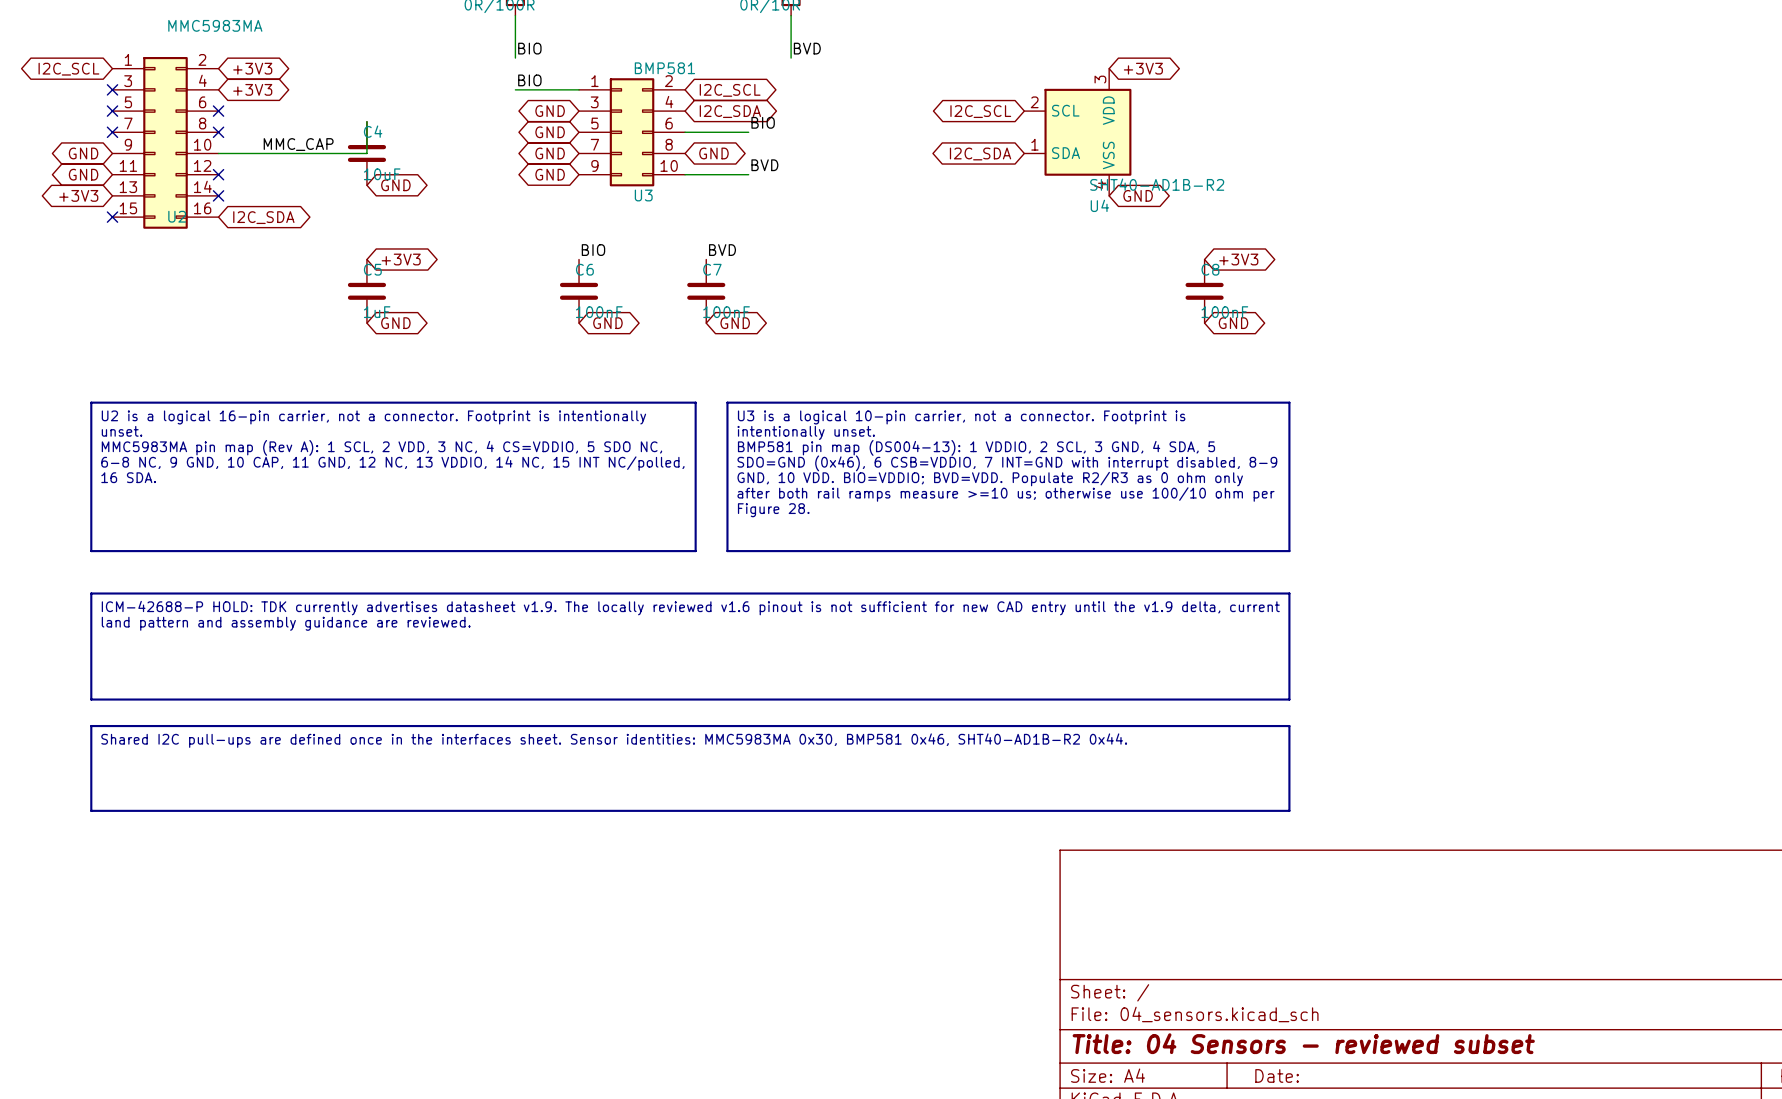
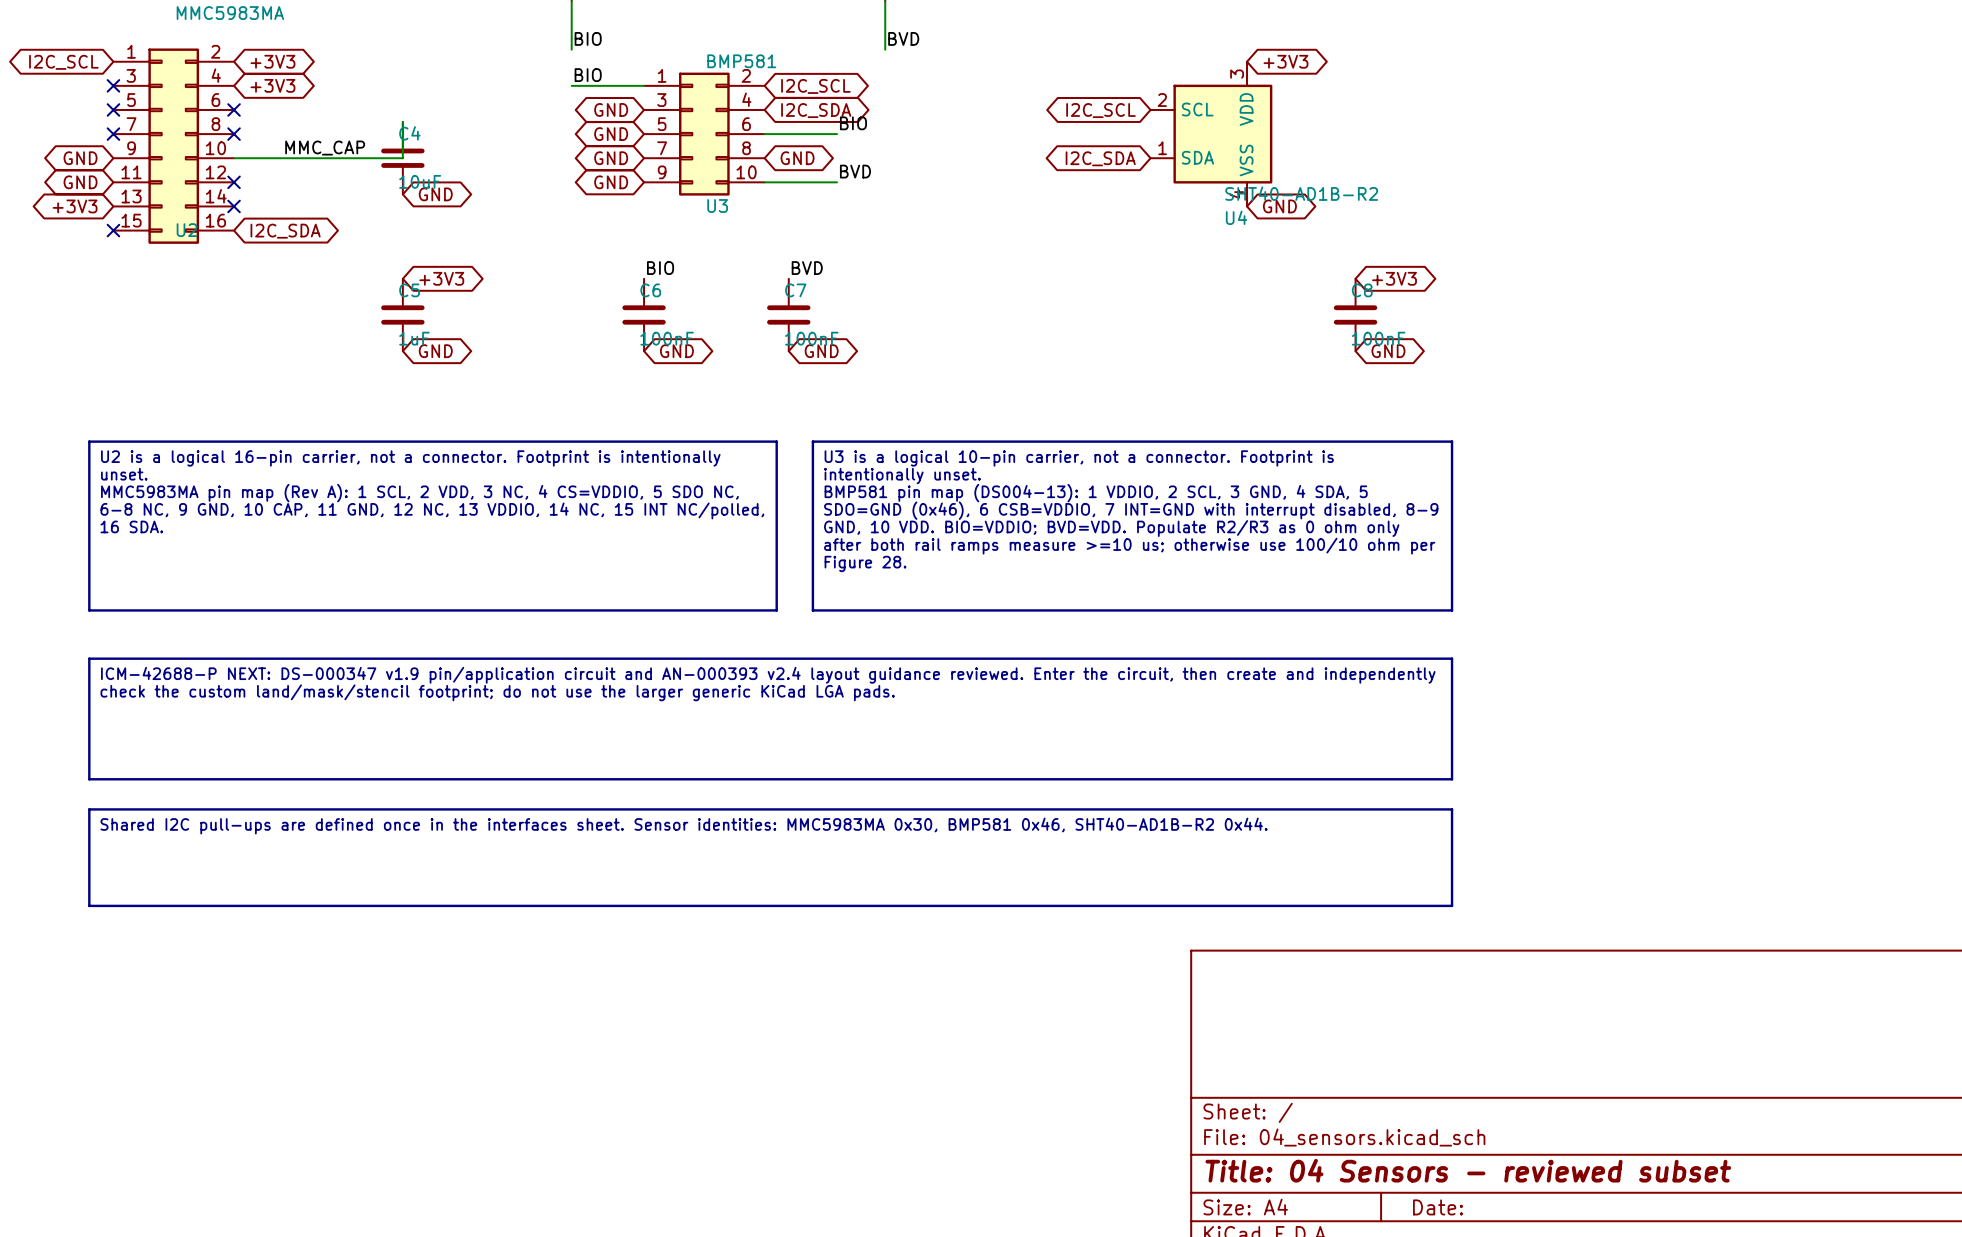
text: ICM-42688-P HOLD: TDK currently advertises datasheet v1.9. The locally reviewed v1.6 pinout is not sufficient for new CAD entry until the v1.9 delta, current (690, 608) -> ICM-42688-P NEXT: DS-000347 v1.9 pin/application circuit and AN-000393 v2.4 layout guidance reviewed. Enter the circuit, then create and independently (768, 675)
text: land pattern and assembly guidance are reviewed. (286, 623) -> check the custom land/mask/stencil footprint; do not use the larger generic KiCad LGA pads. (497, 692)

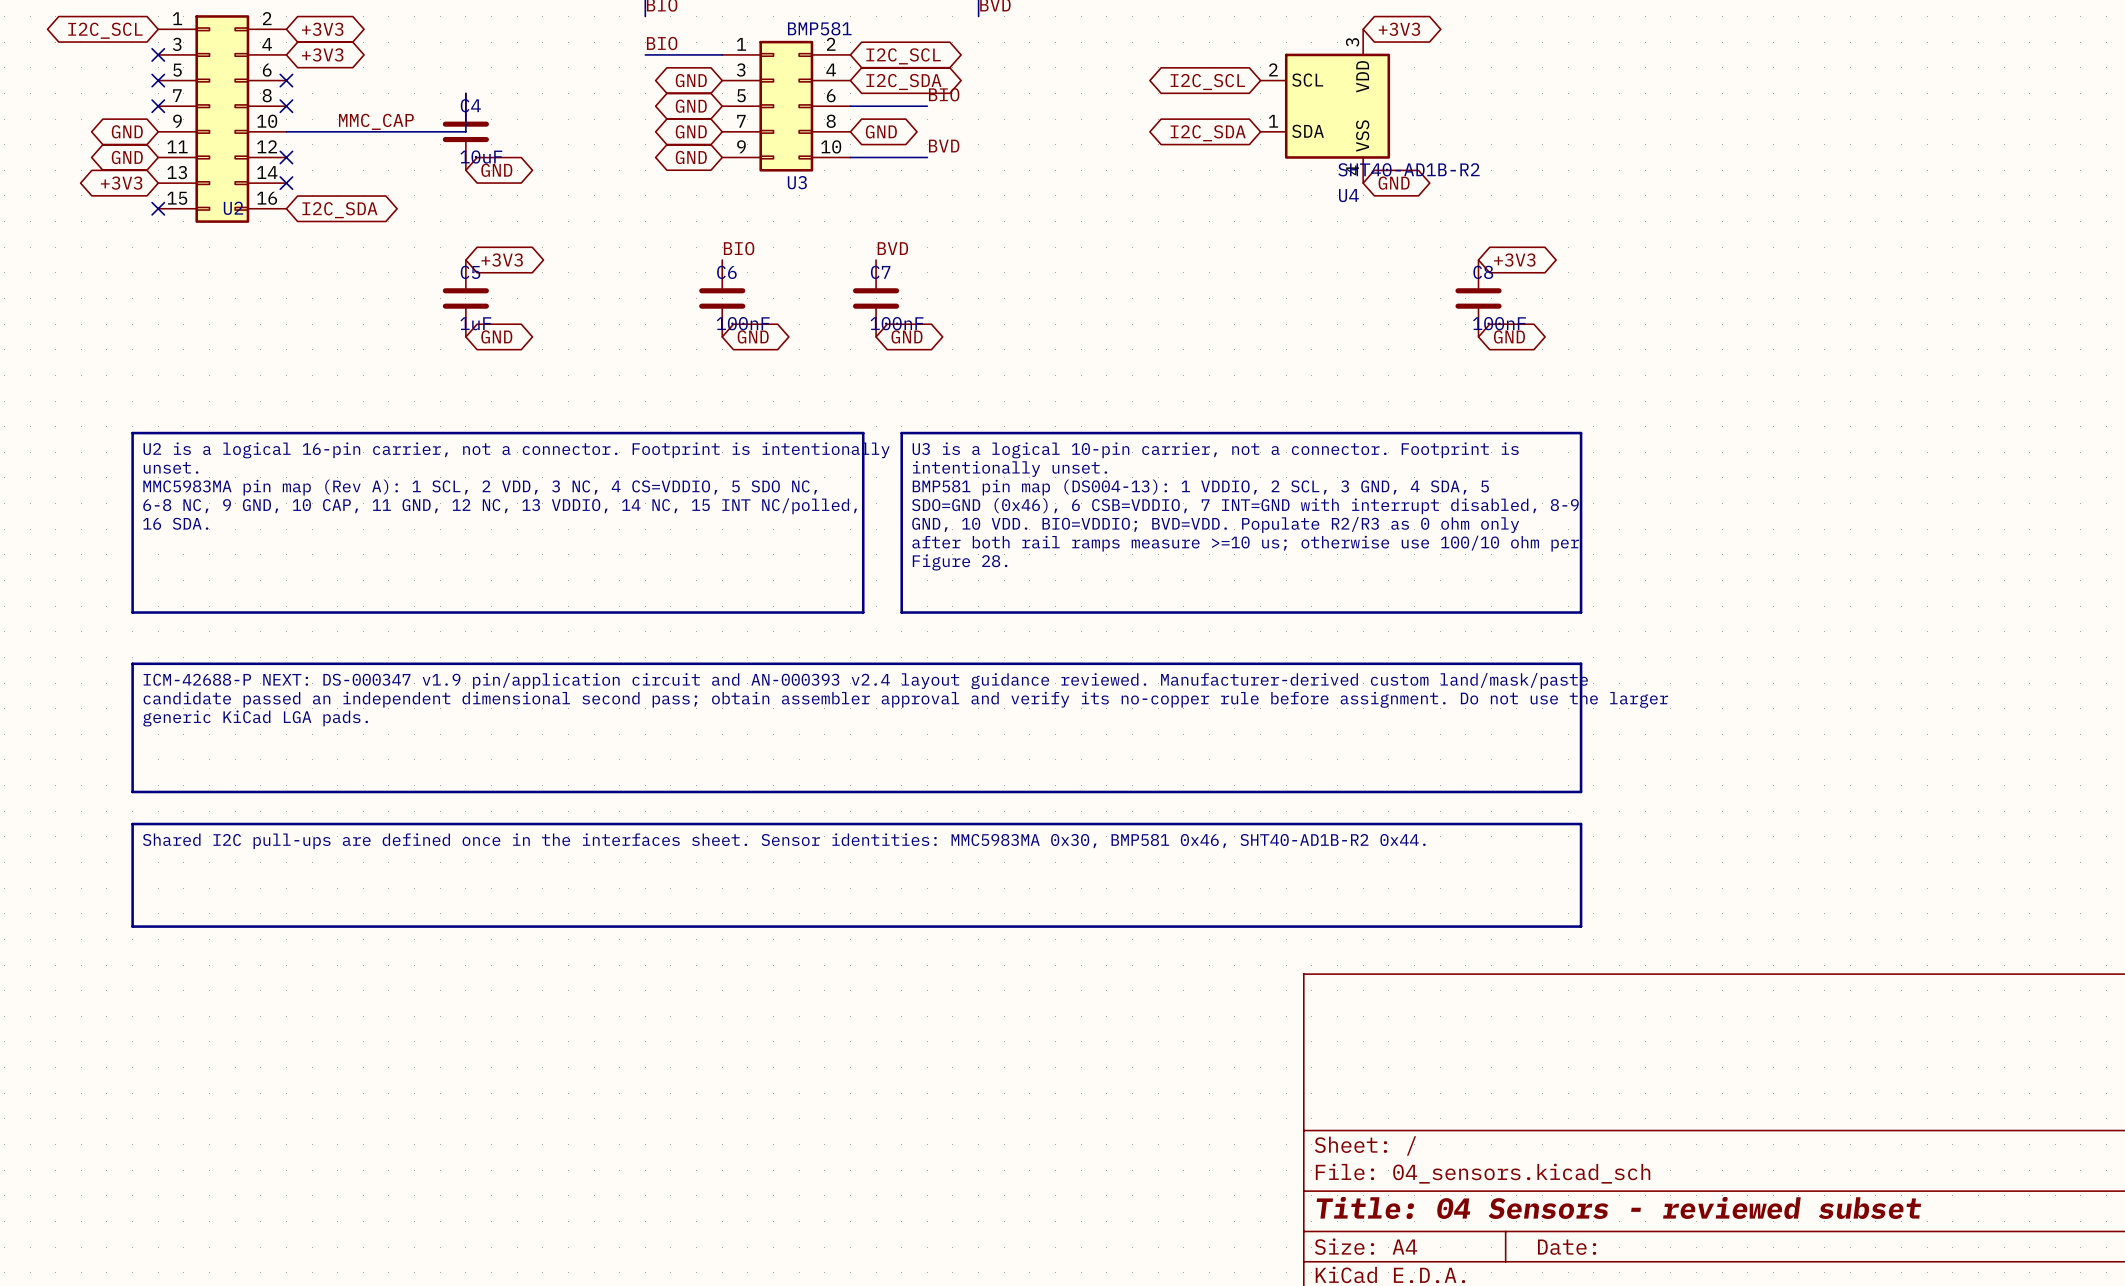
text: ICM-42688-P NEXT: DS-000347 v1.9 pin/application circuit and AN-000393 v2.4 layout guidance reviewed. Enter the circuit, then create and independently (768, 675) -> ICM-42688-P NEXT: DS-000347 v1.9 pin/application circuit and AN-000393 v2.4 layout guidance reviewed. Manufacturer-derived custom land/mask/paste (865, 681)
text: check the custom land/mask/stencil footprint; do not use the larger generic KiCad LGA pads. (497, 692) -> candidate passed an independent dimensional second pass; obtain assembler approval and verify its no-copper rule before assignment. Do not use the larger (905, 699)
text: none -> generic KiCad LGA pads. (255, 718)

